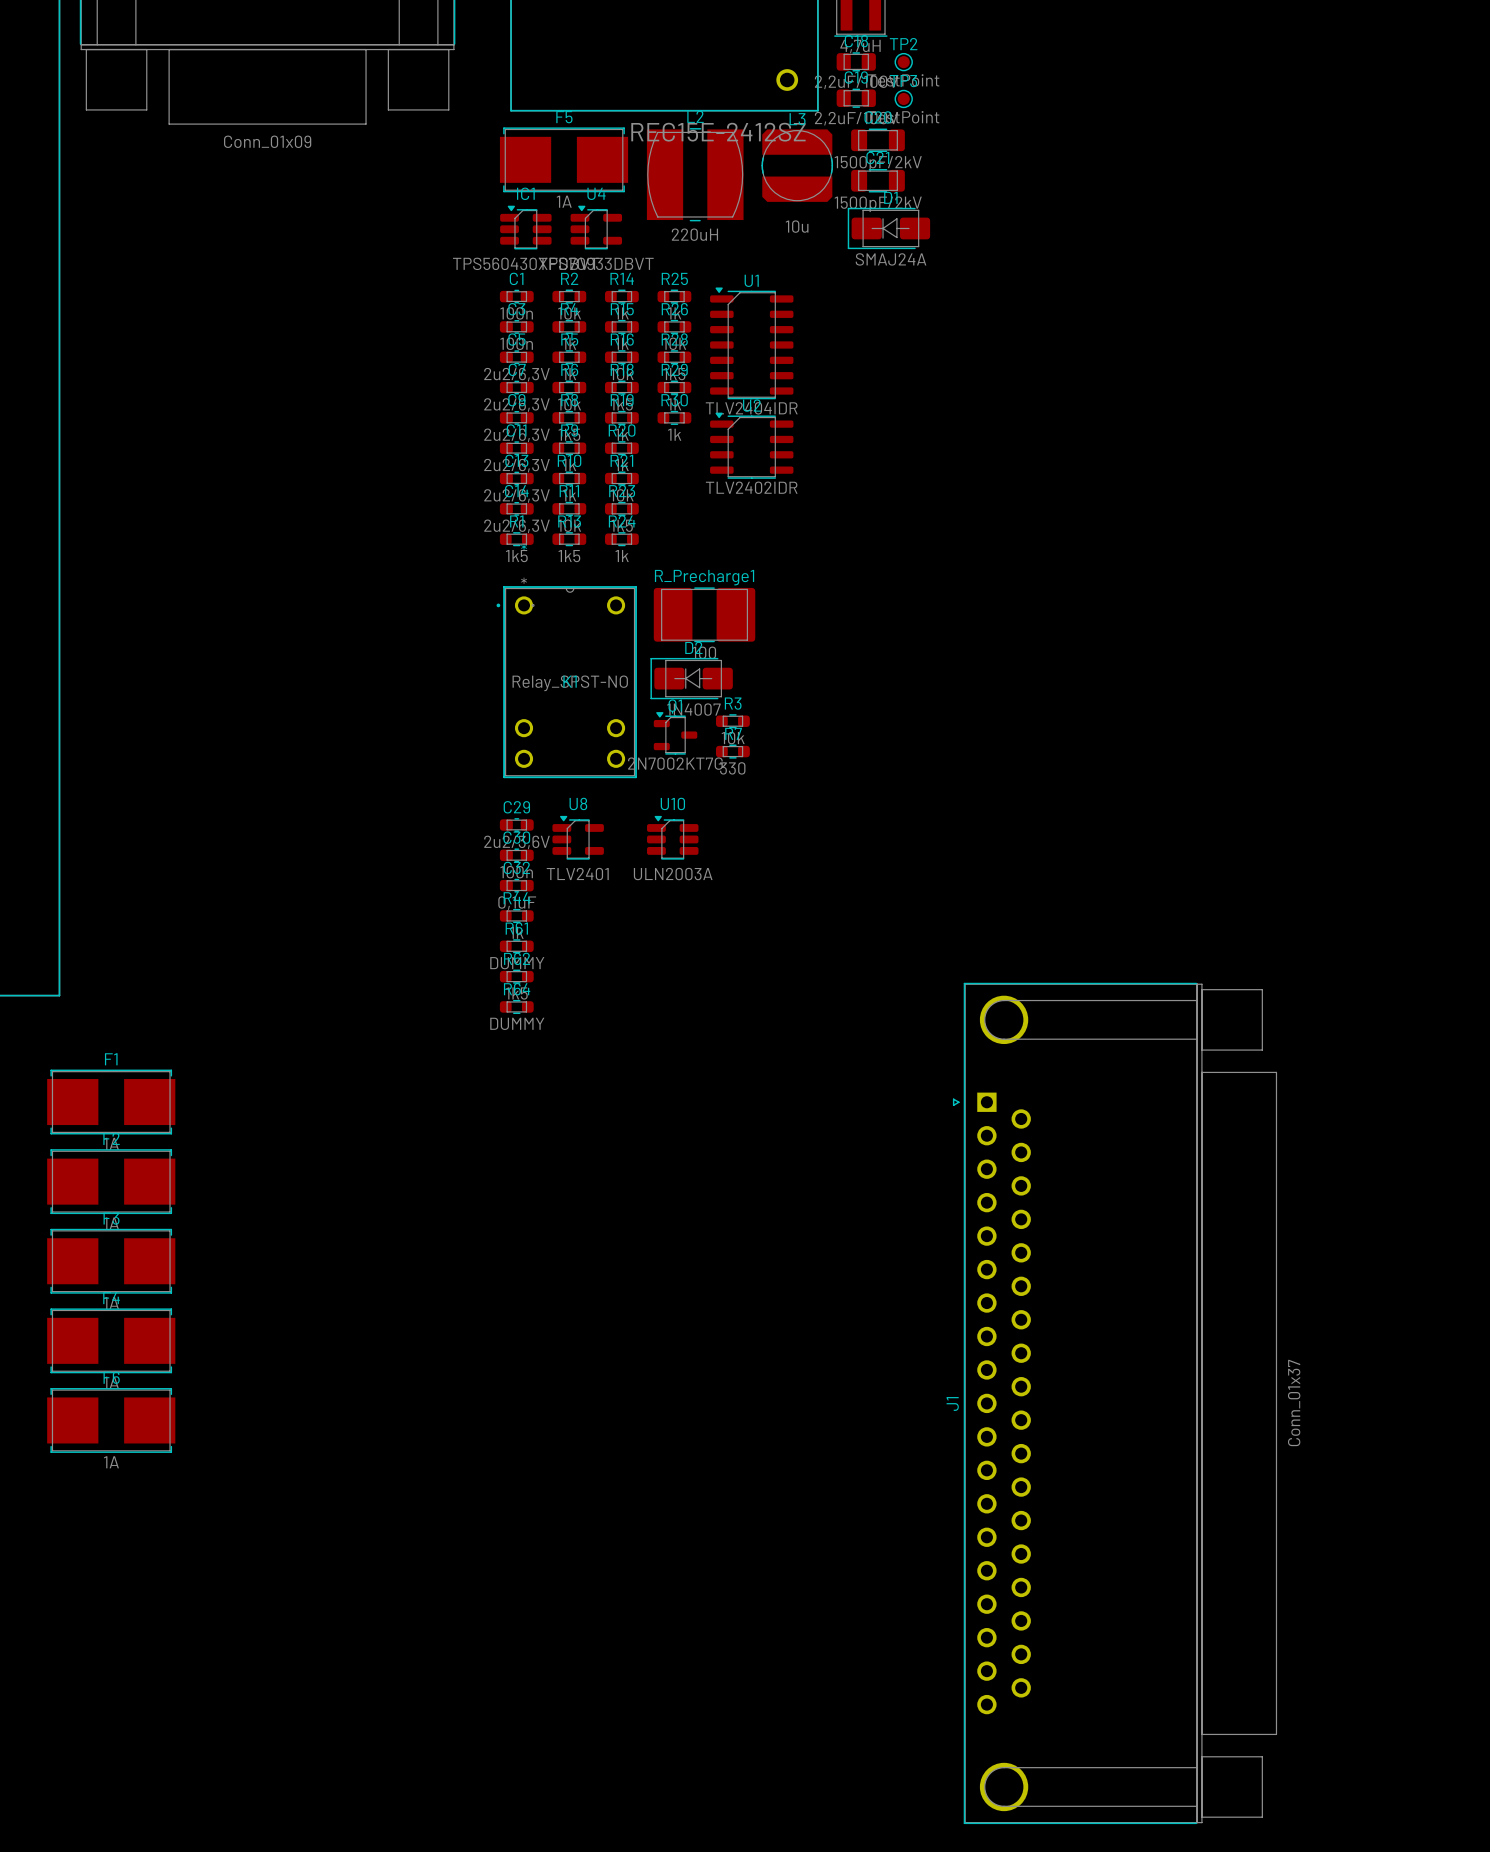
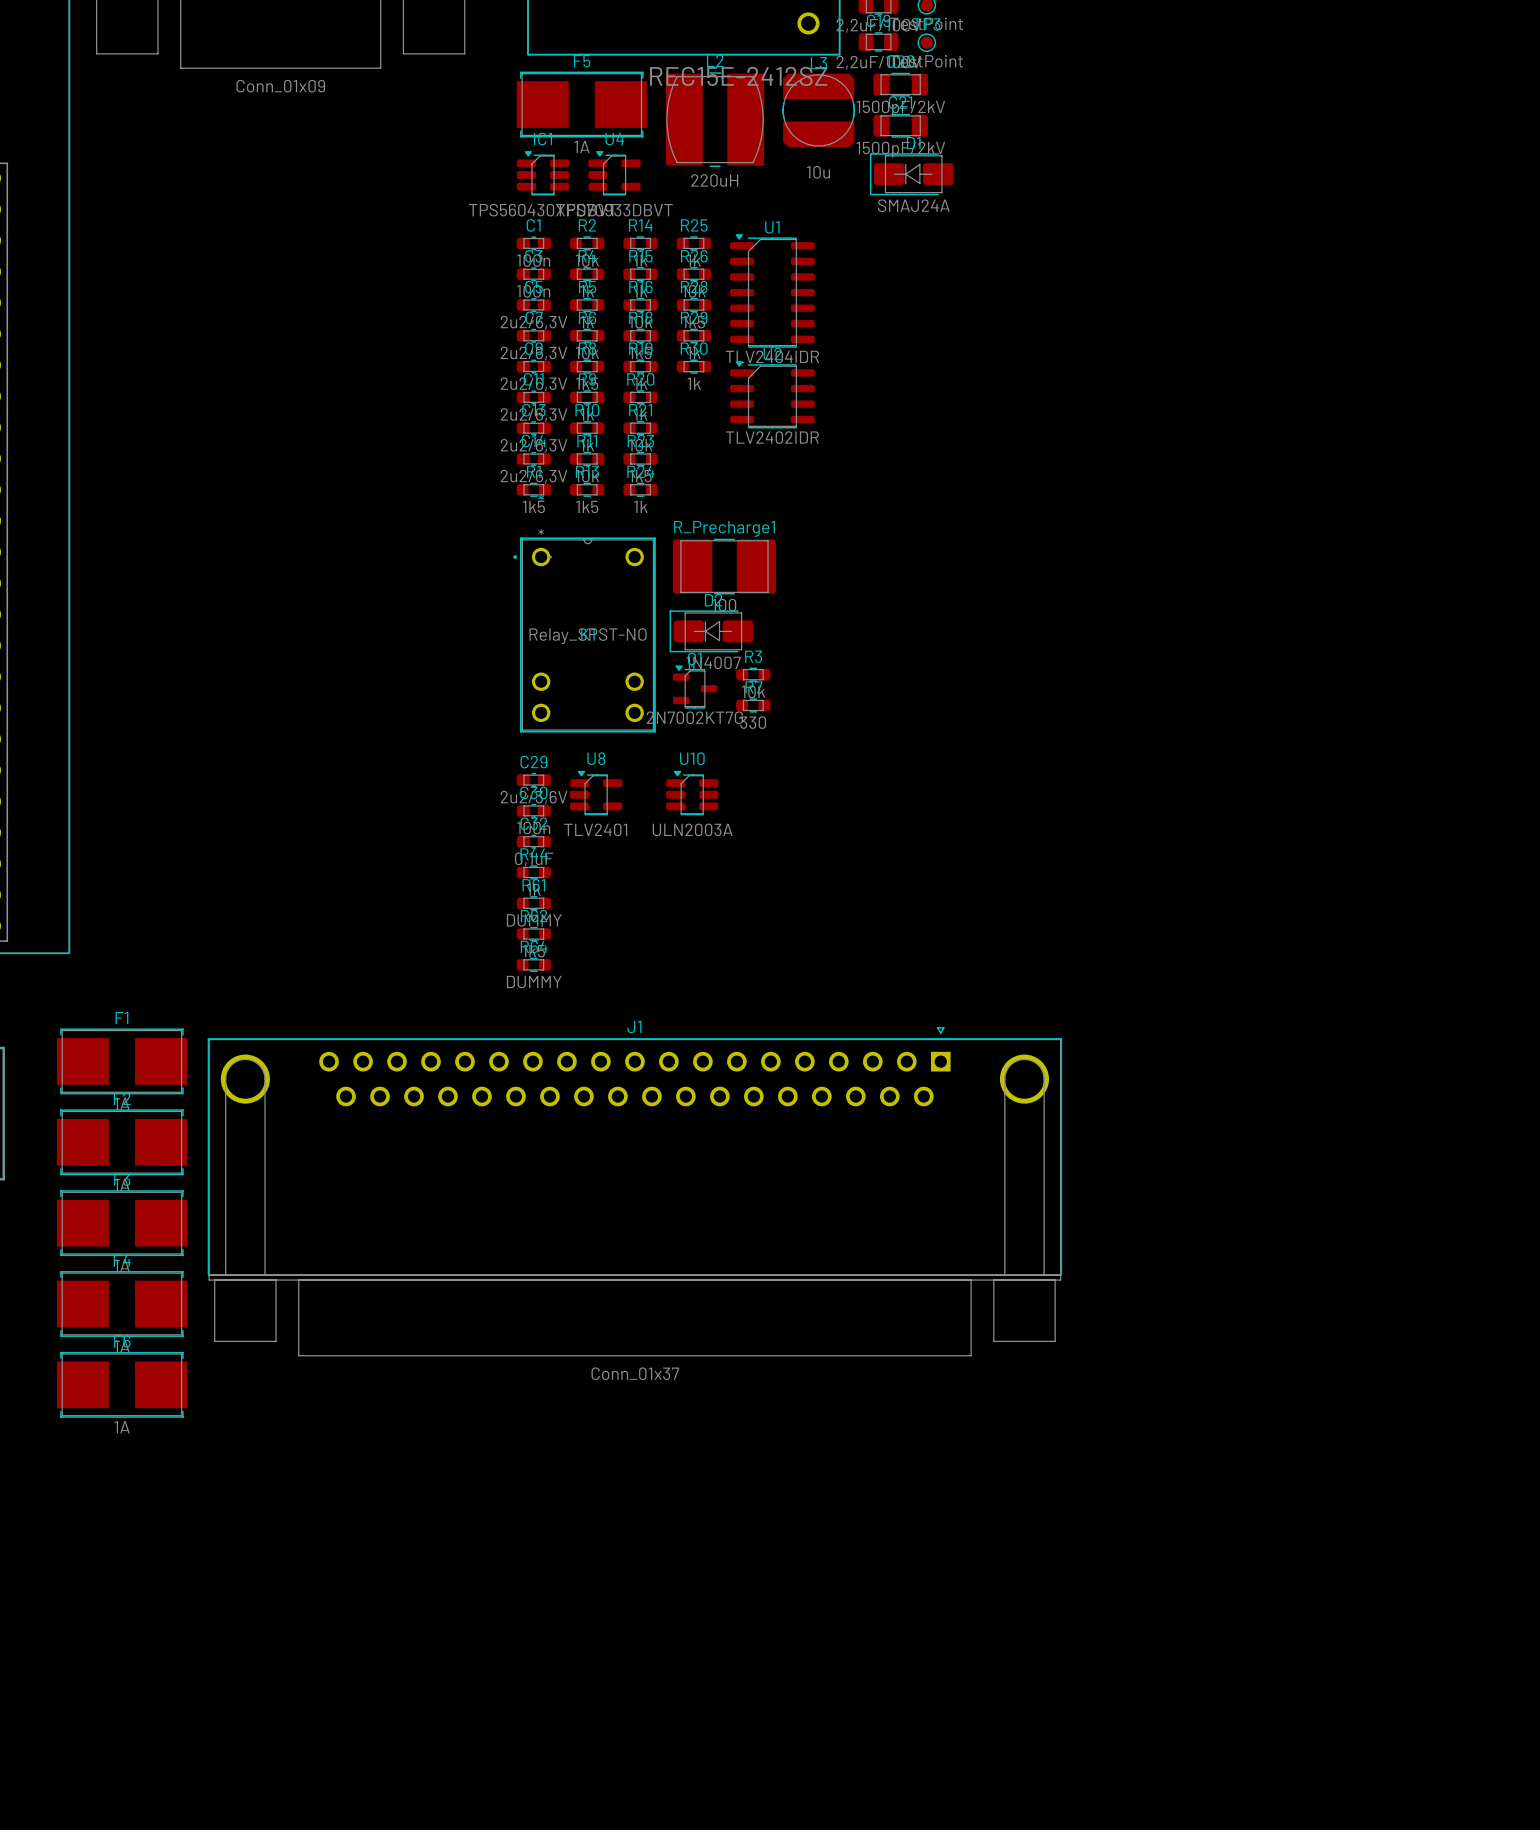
J1 rotation: 0° (1115, 1403) -> 90° clockwise (634, 1191)
J1 position: (1115, 1403) -> (634, 1191)

